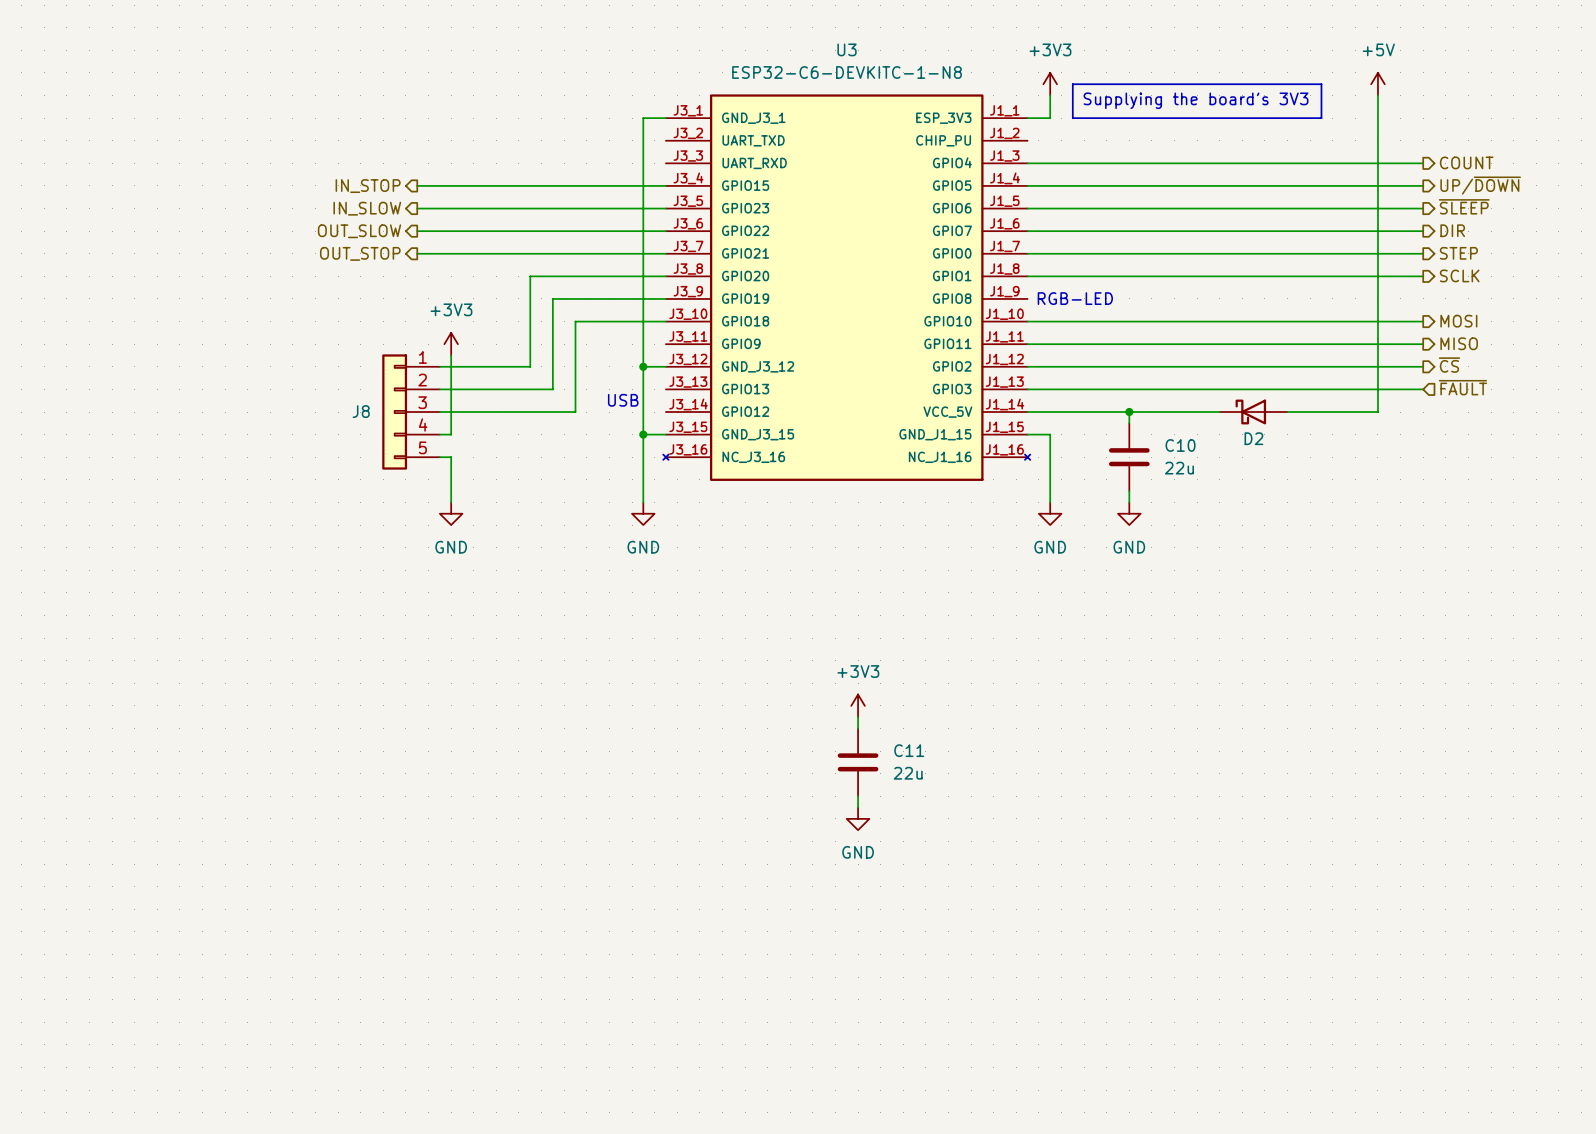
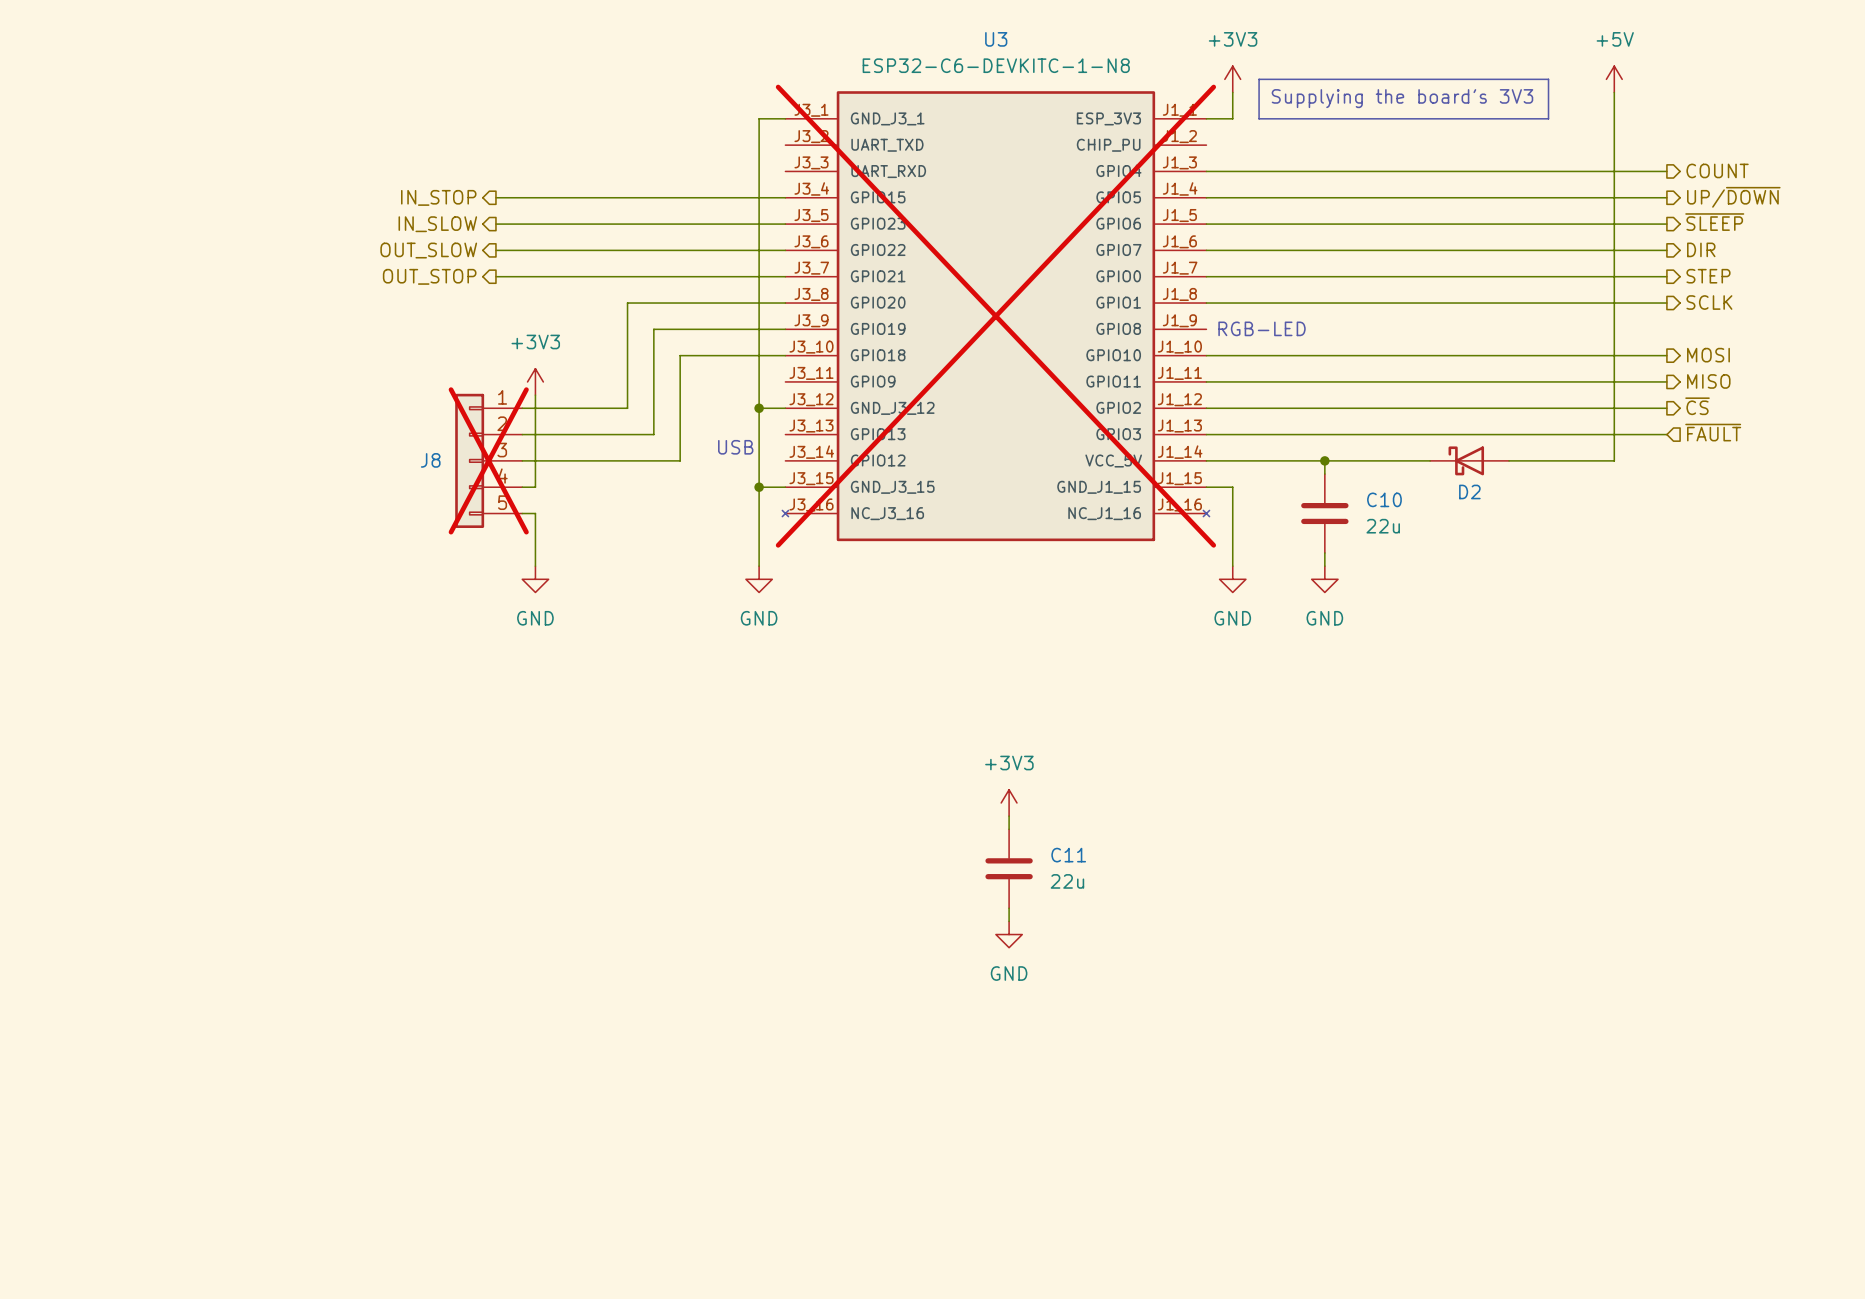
U3 do-not-place cross: none -> (995, 316)
J8 do-not-place cross: none -> (488, 460)

